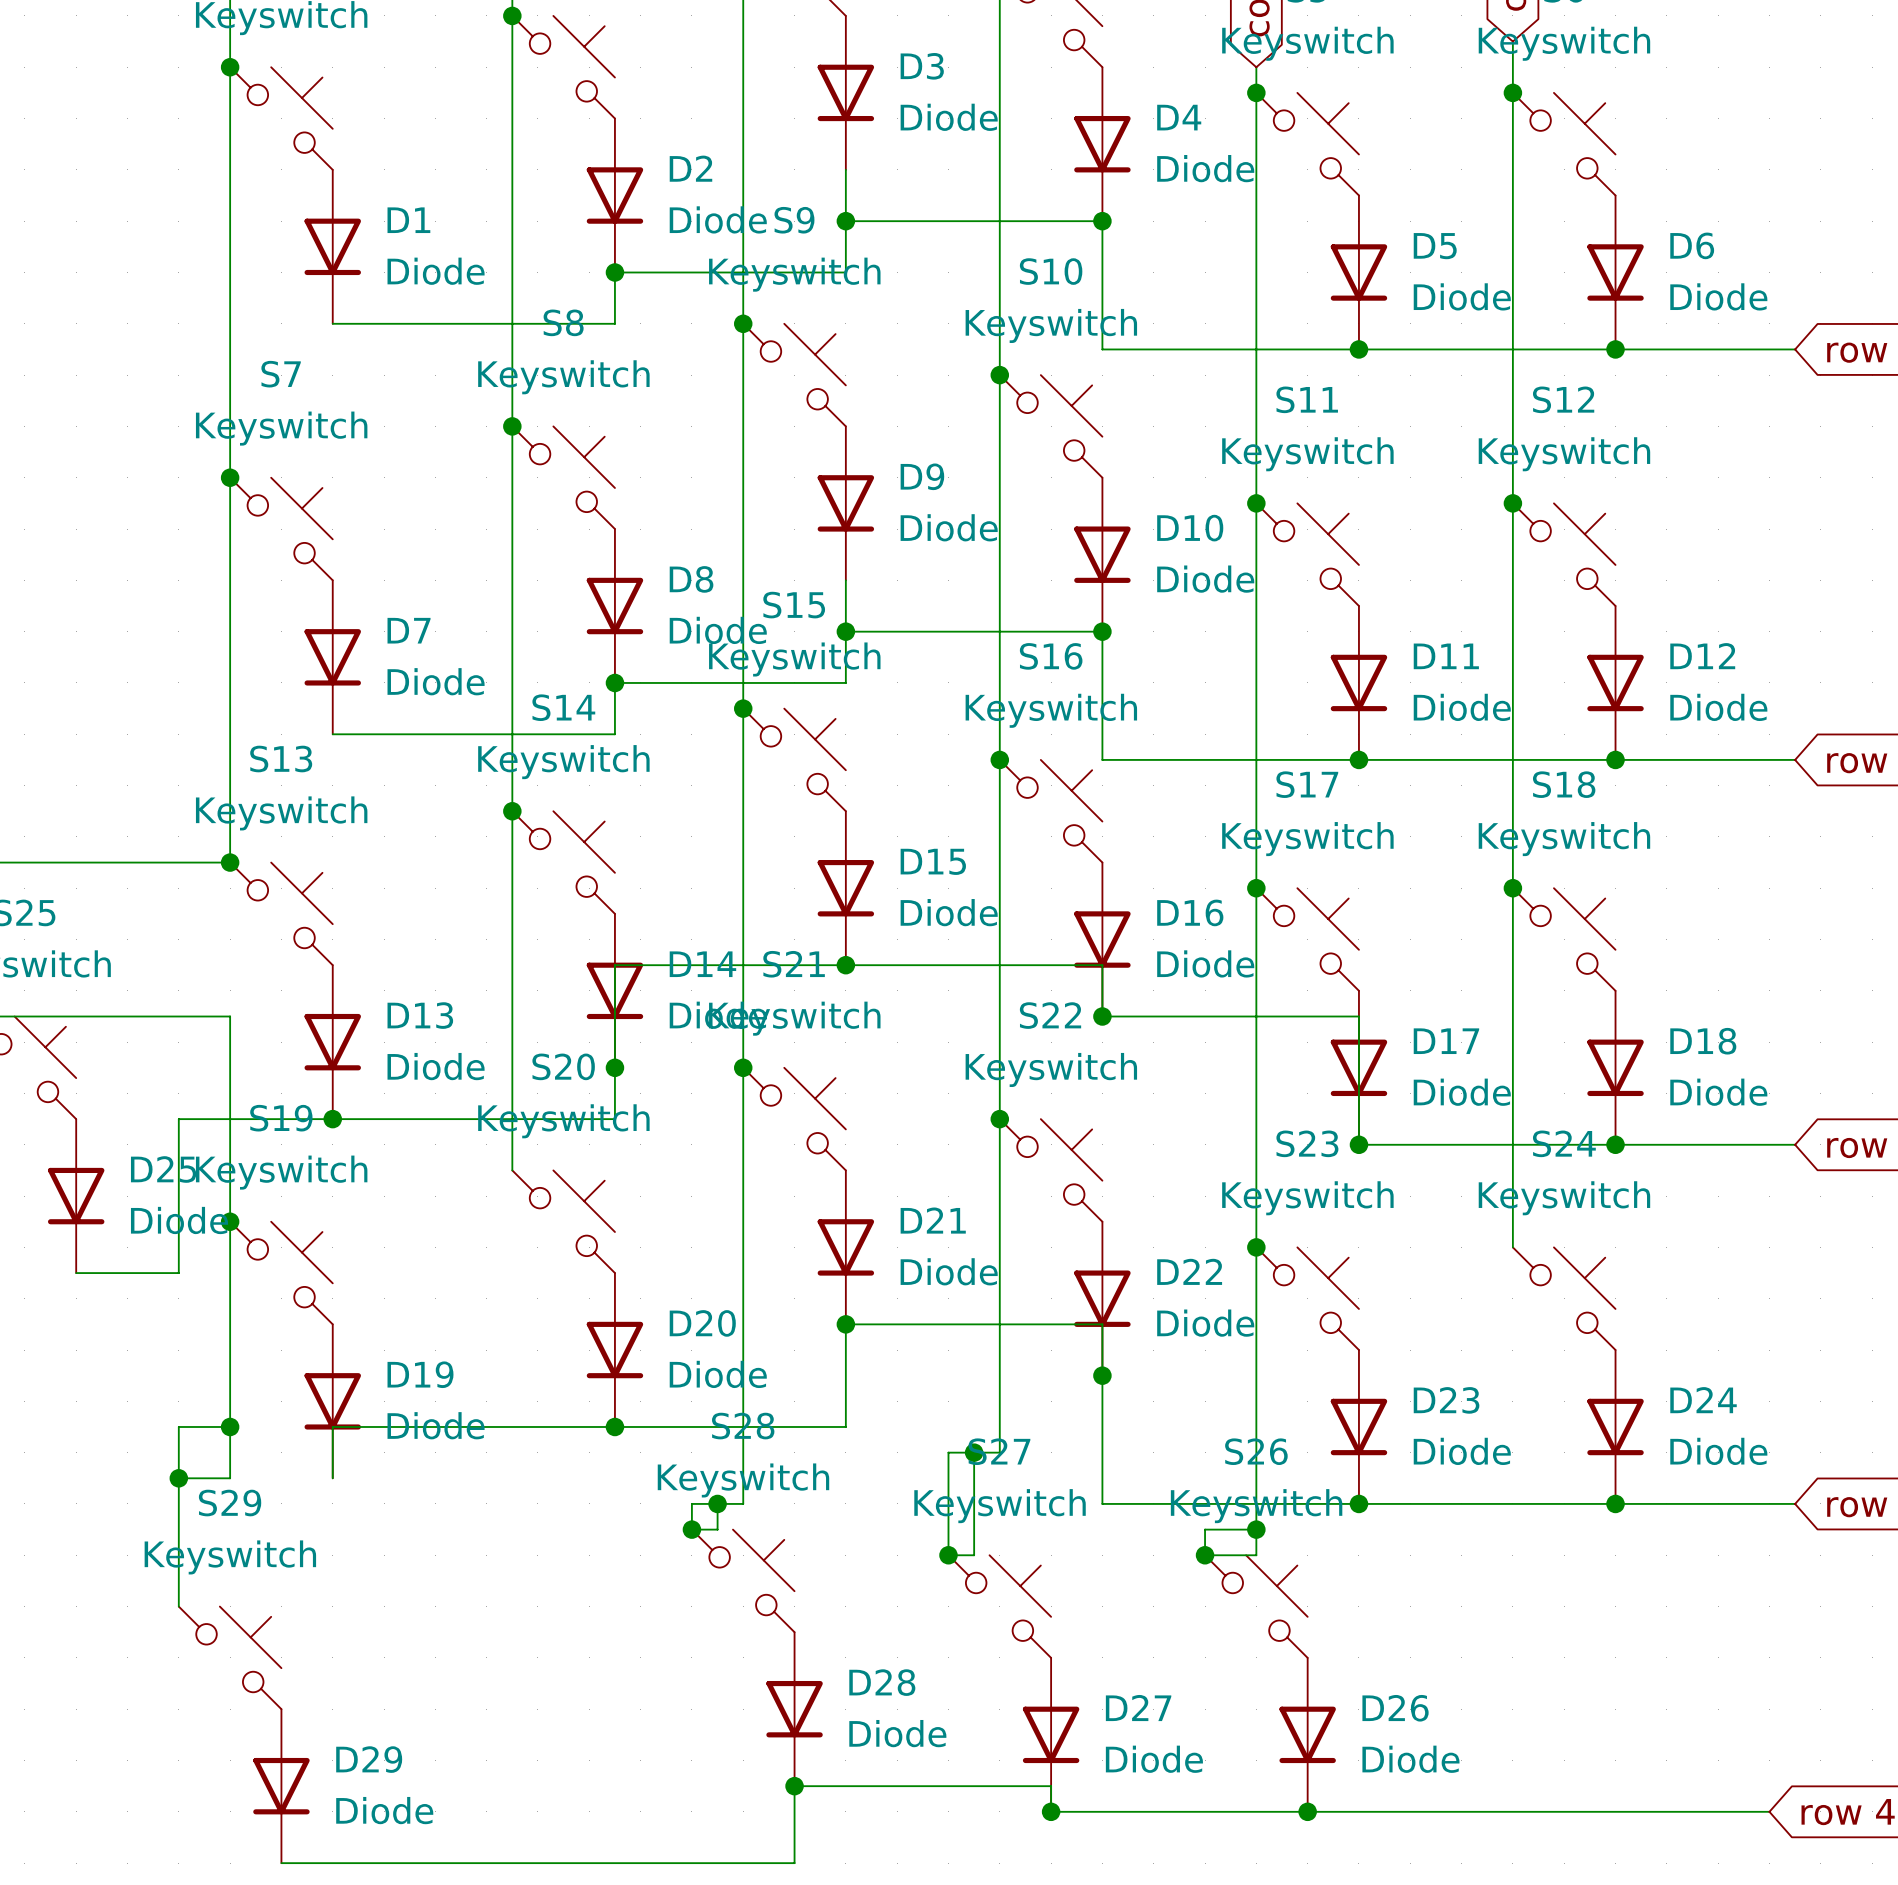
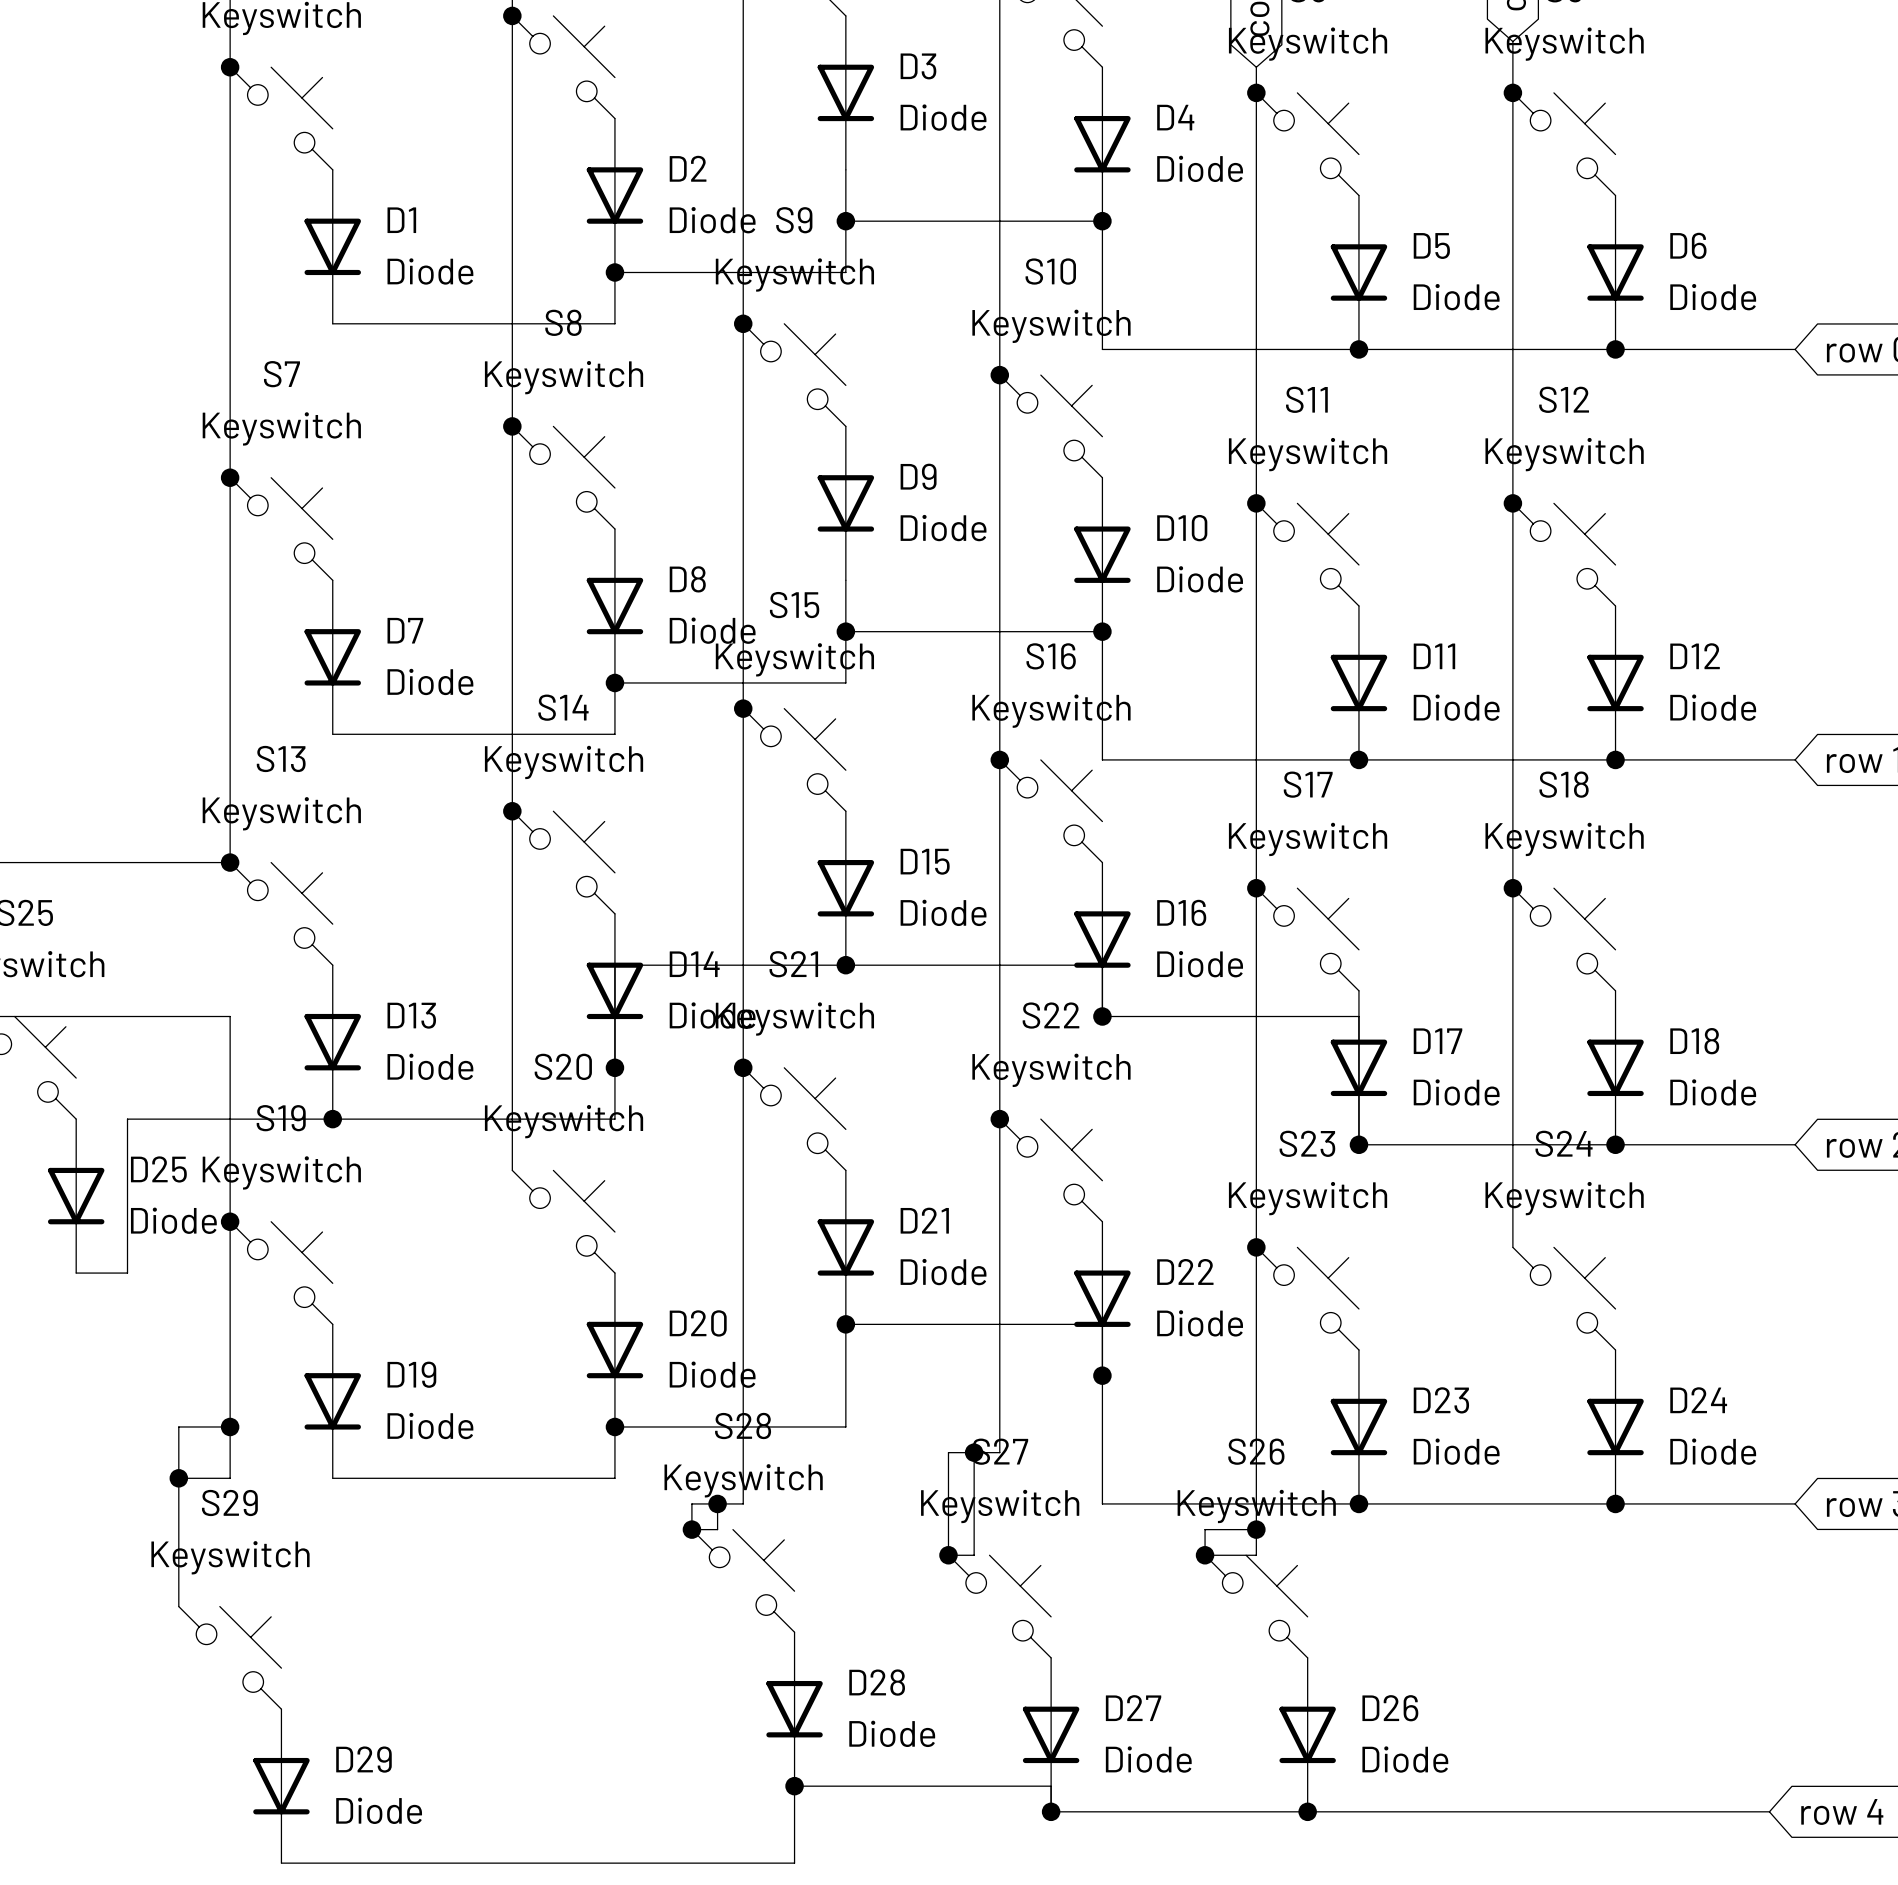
wire: (178, 1119) (178, 1273) (127, 1273) -> (178, 1119) (127, 1119) (127, 1273)
wire: (614, 1426) (332, 1426) (332, 1478) -> (614, 1426) (614, 1478) (332, 1478)

